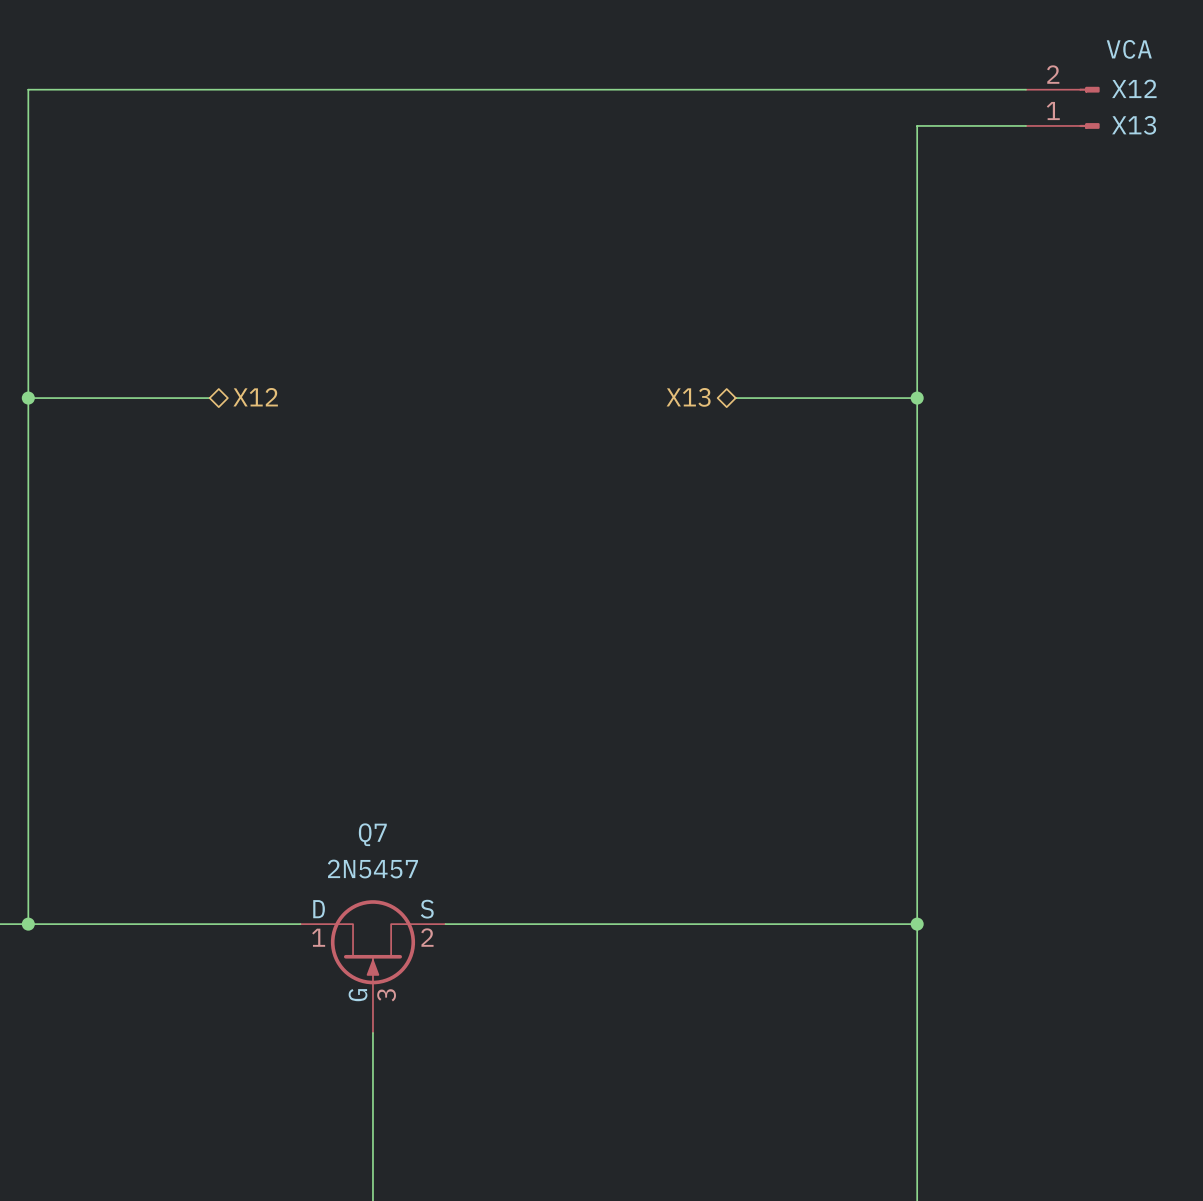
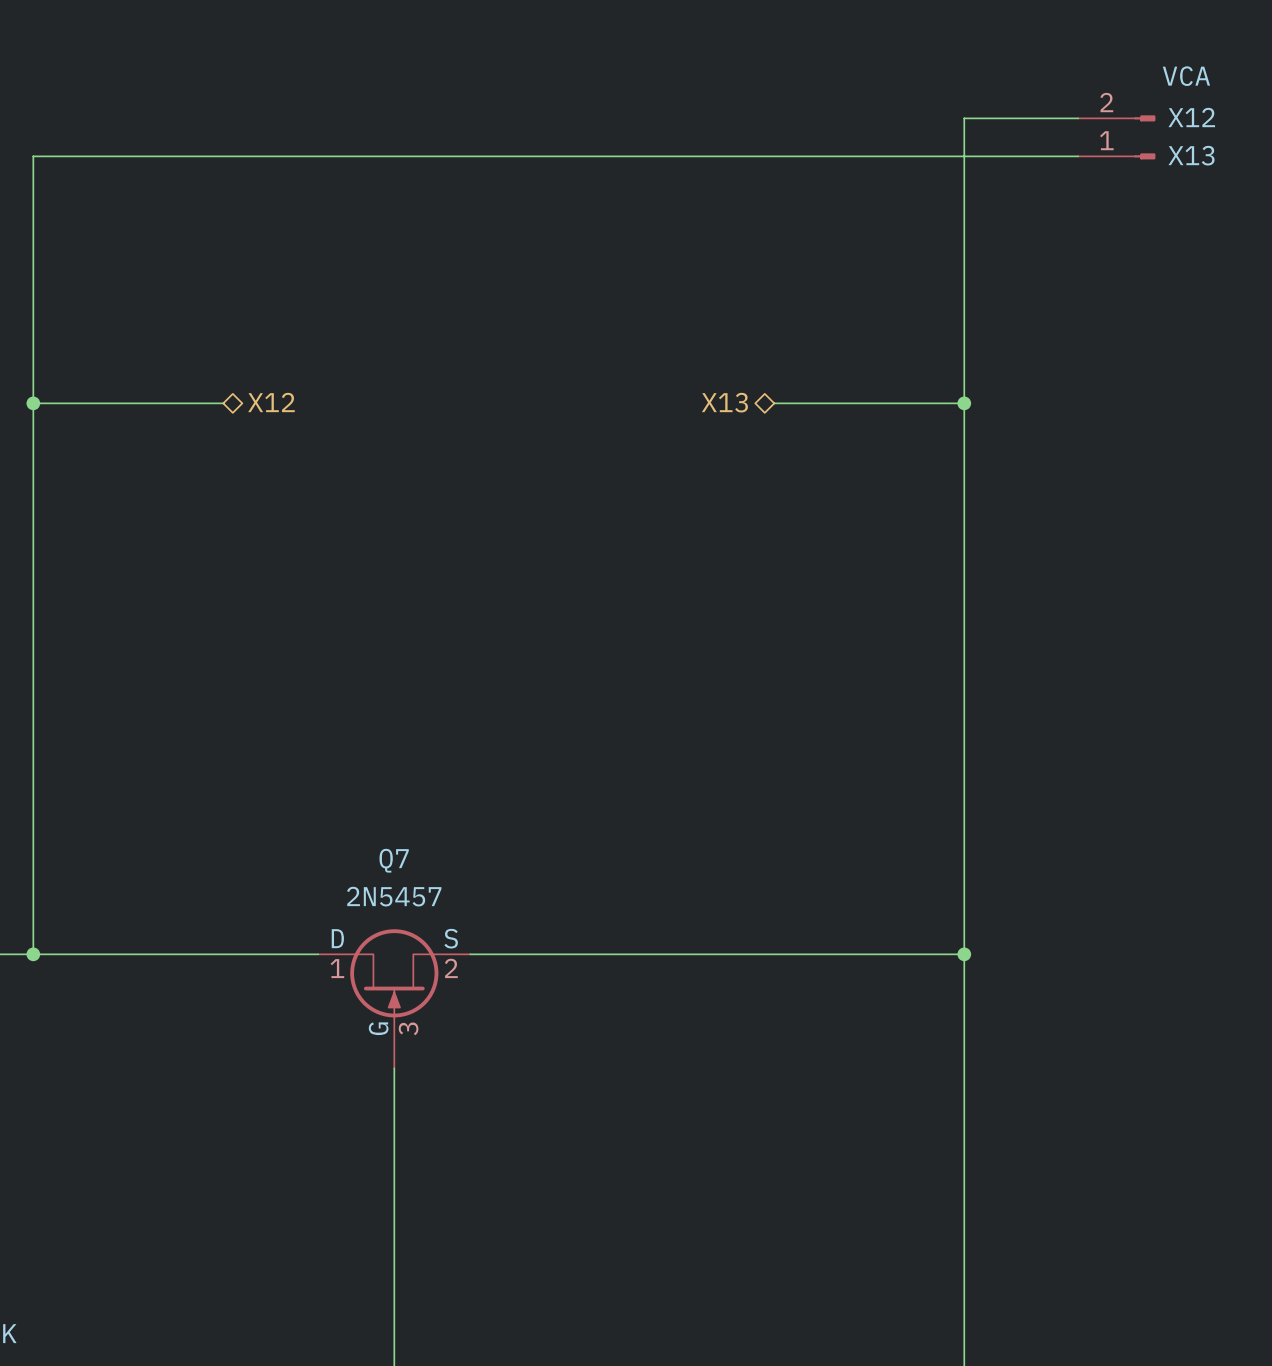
wire: (1026, 89) (28, 89) (28, 162) -> (1078, 156) (33, 156)
part position: (1062, 107) -> (1116, 137)

